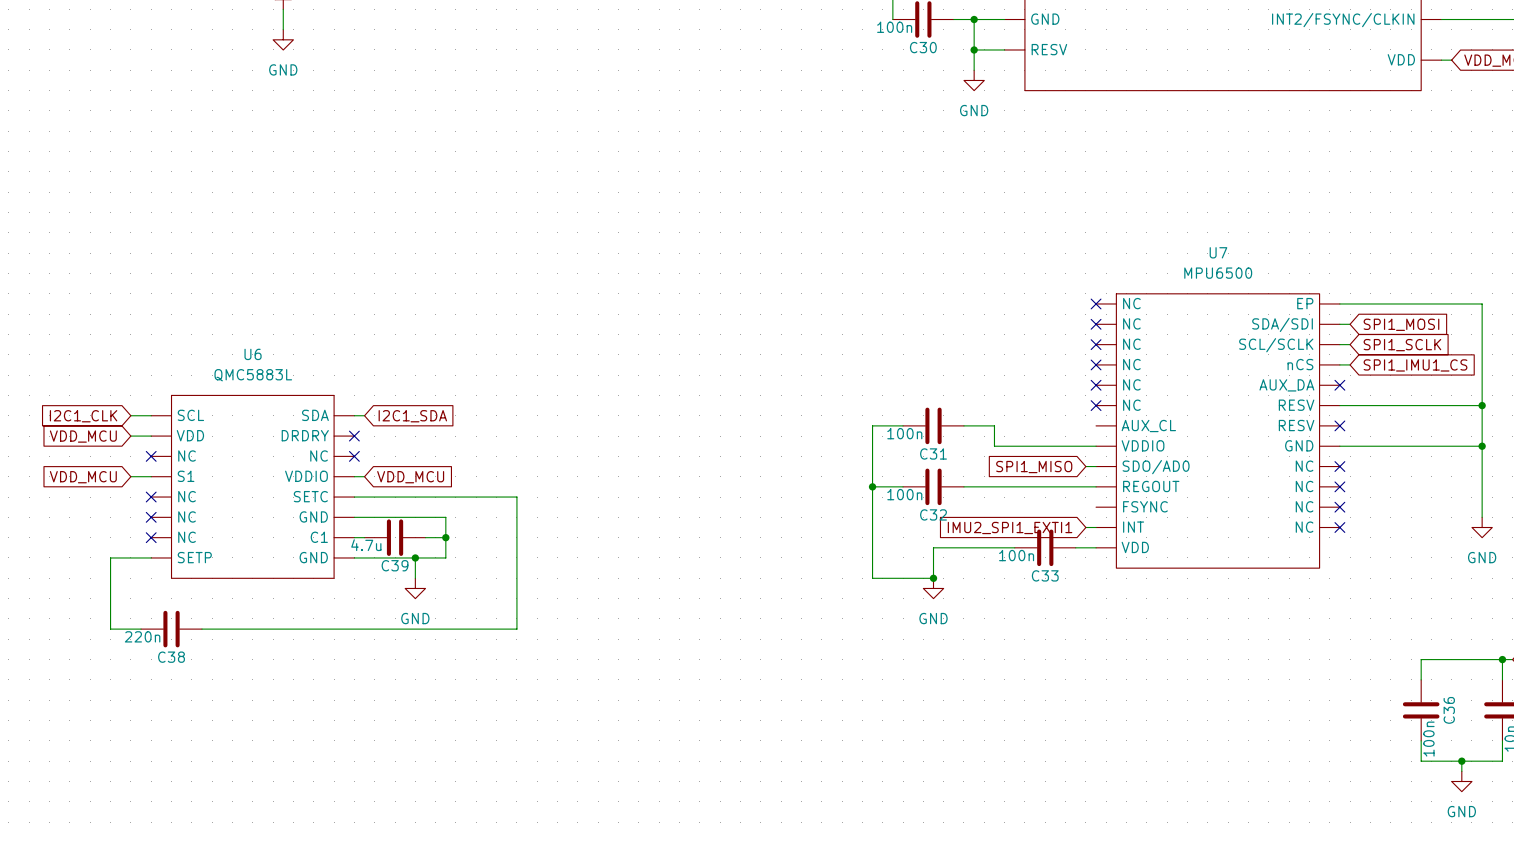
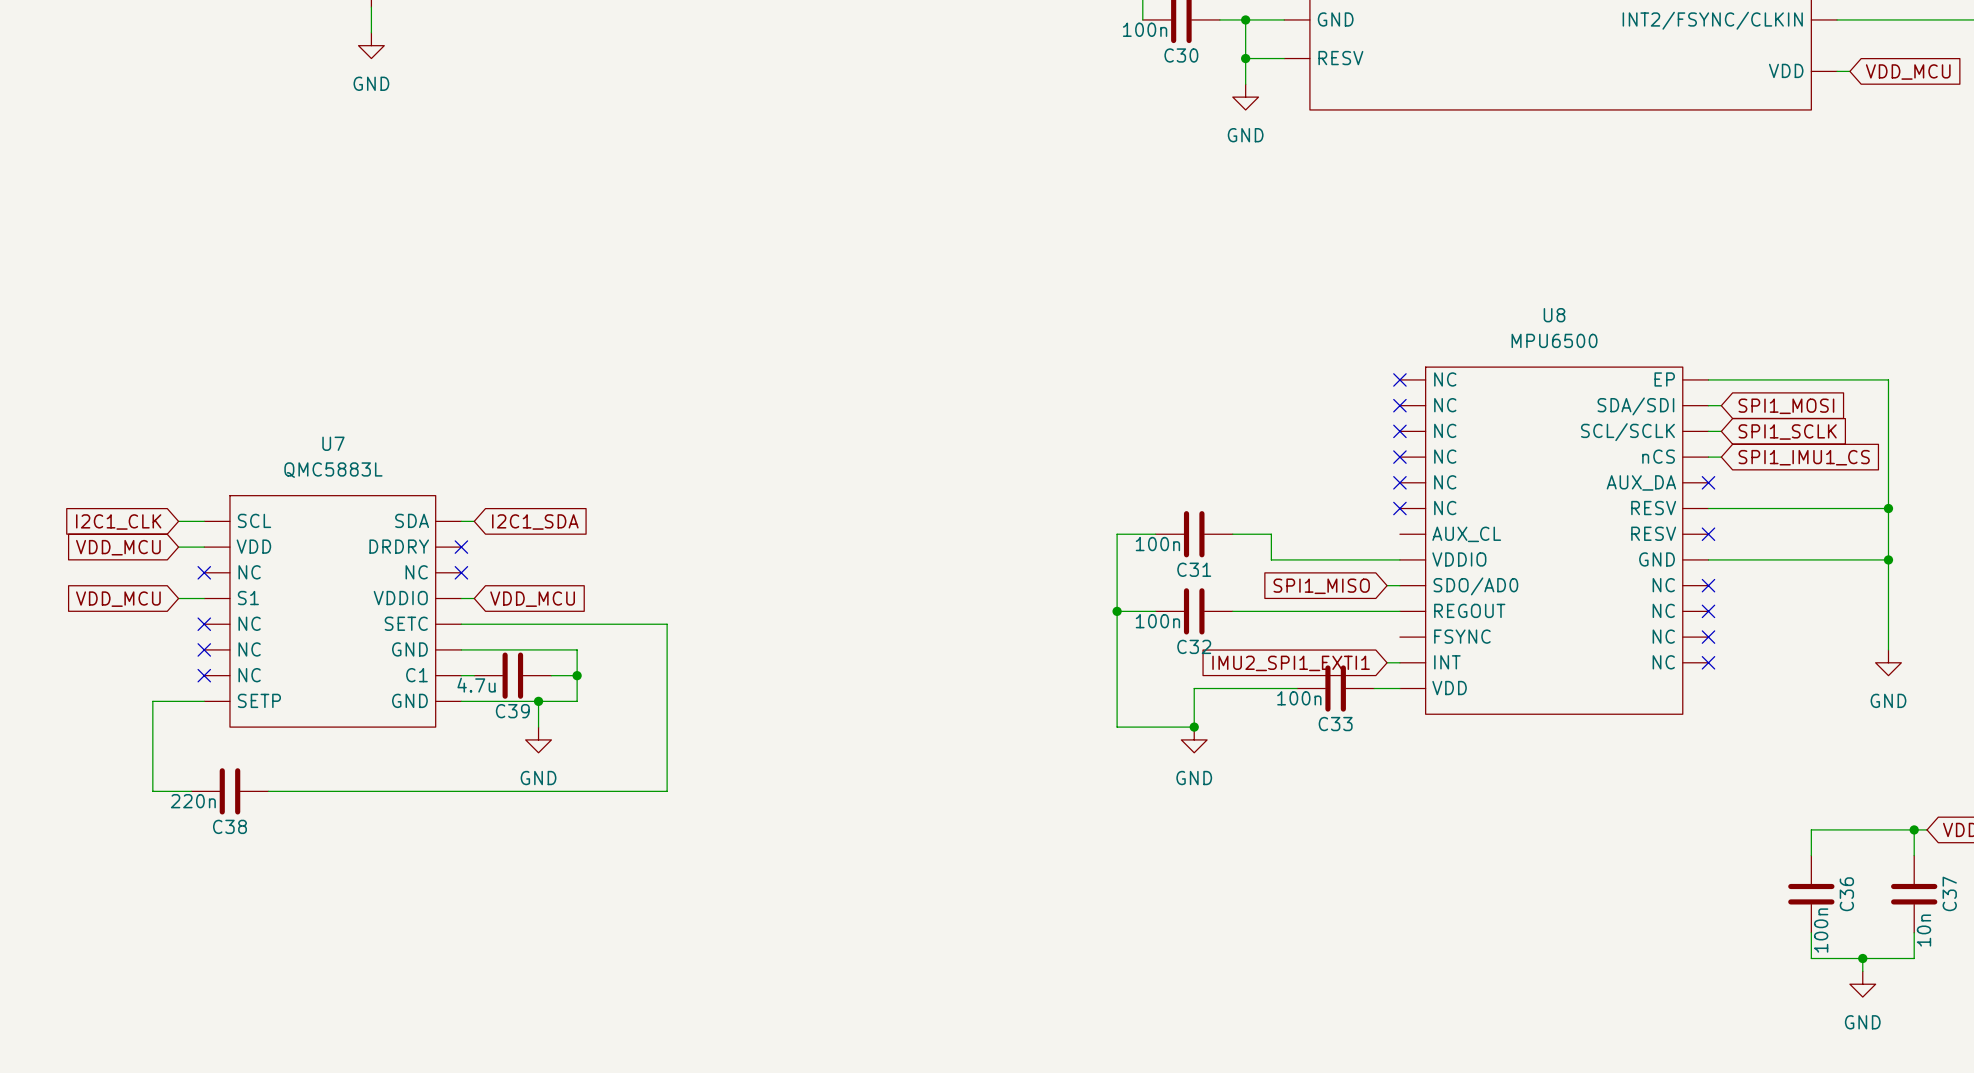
U7 name: U7 (1218, 252) -> U8 (1554, 315)
U6 name: U6 (253, 354) -> U7 (333, 443)

